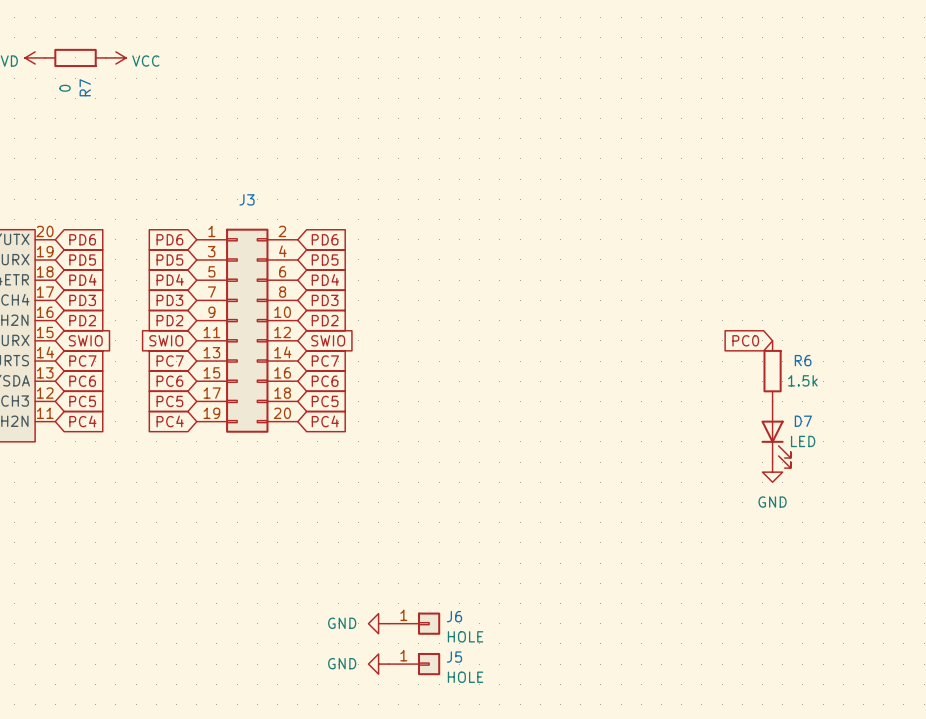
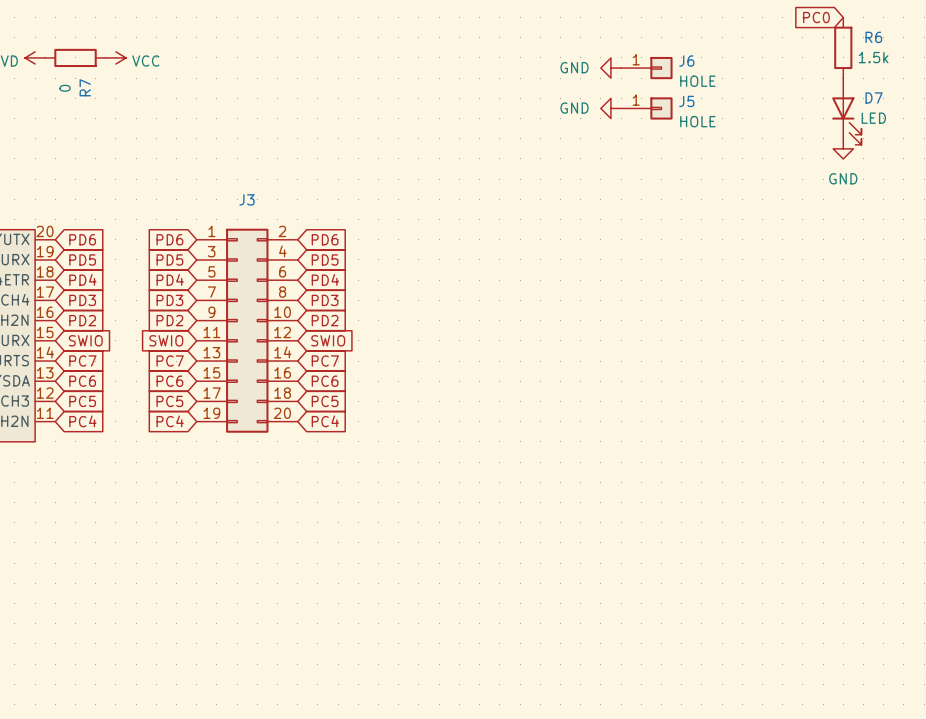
global label: none -> PC0 (816, 17)
power symbol: none -> GND (610, 68)
power symbol: none -> GND (610, 108)
power symbol: none -> GND (843, 148)
global label: PC0 (745, 340) -> none
R6 position: (772, 371) -> (843, 47)
D7 position: (776, 434) -> (846, 111)
power symbol: GND (772, 472) -> none
power symbol: GND (378, 623) -> none
J6 position: (414, 623) -> (646, 68)
power symbol: GND (378, 664) -> none
J5 position: (414, 664) -> (646, 108)

